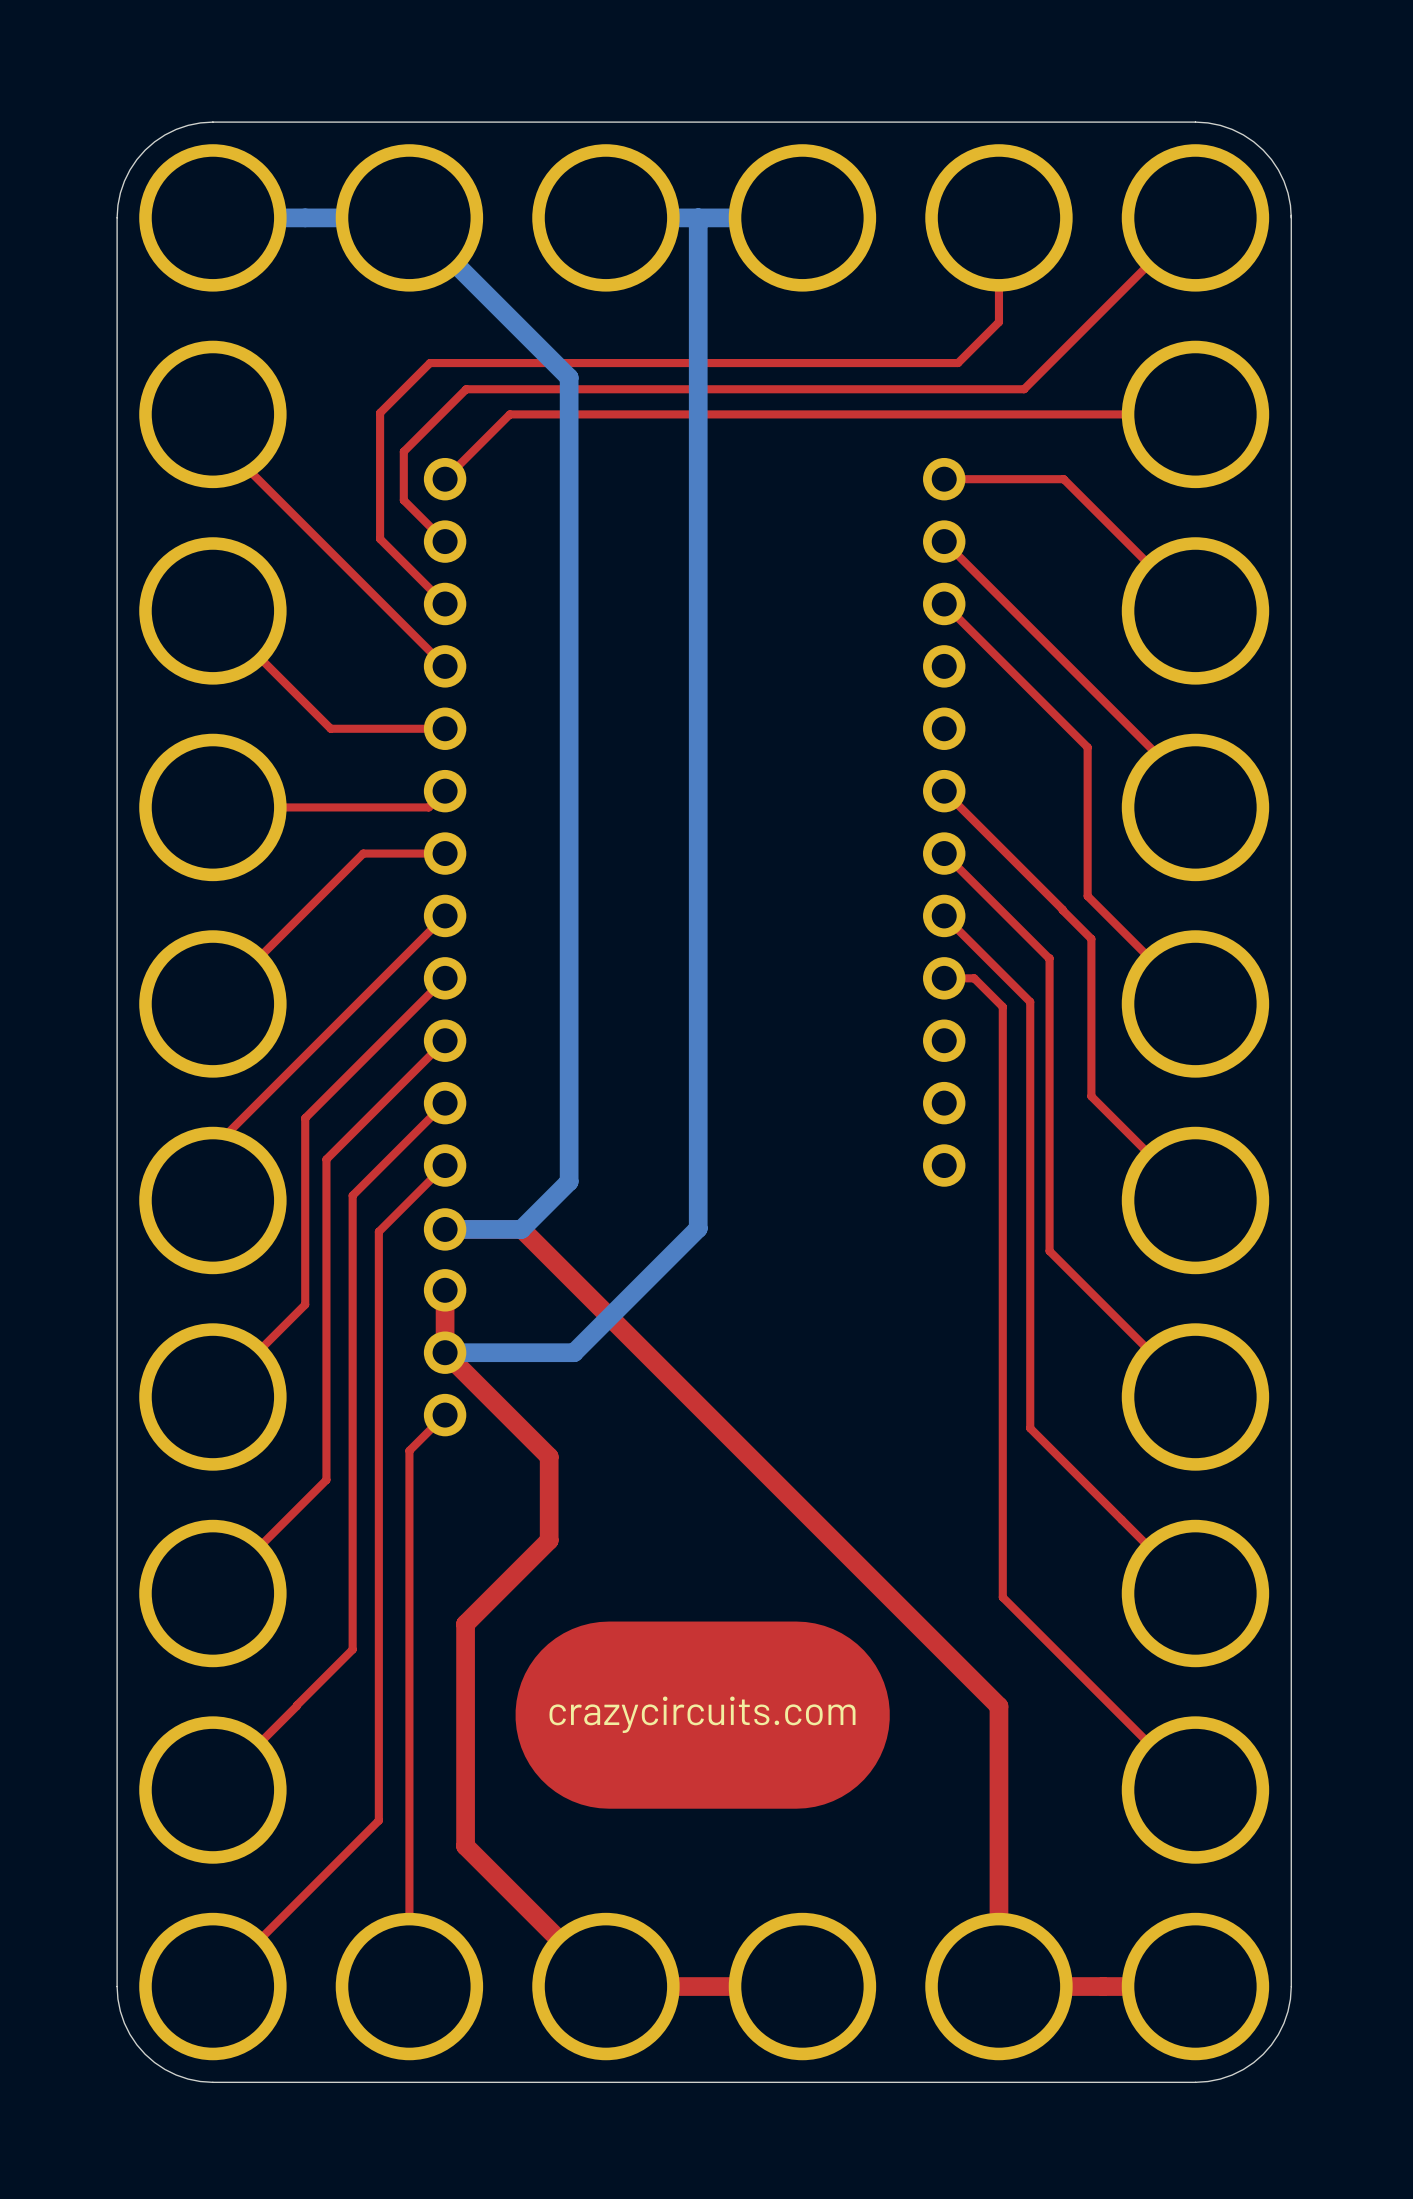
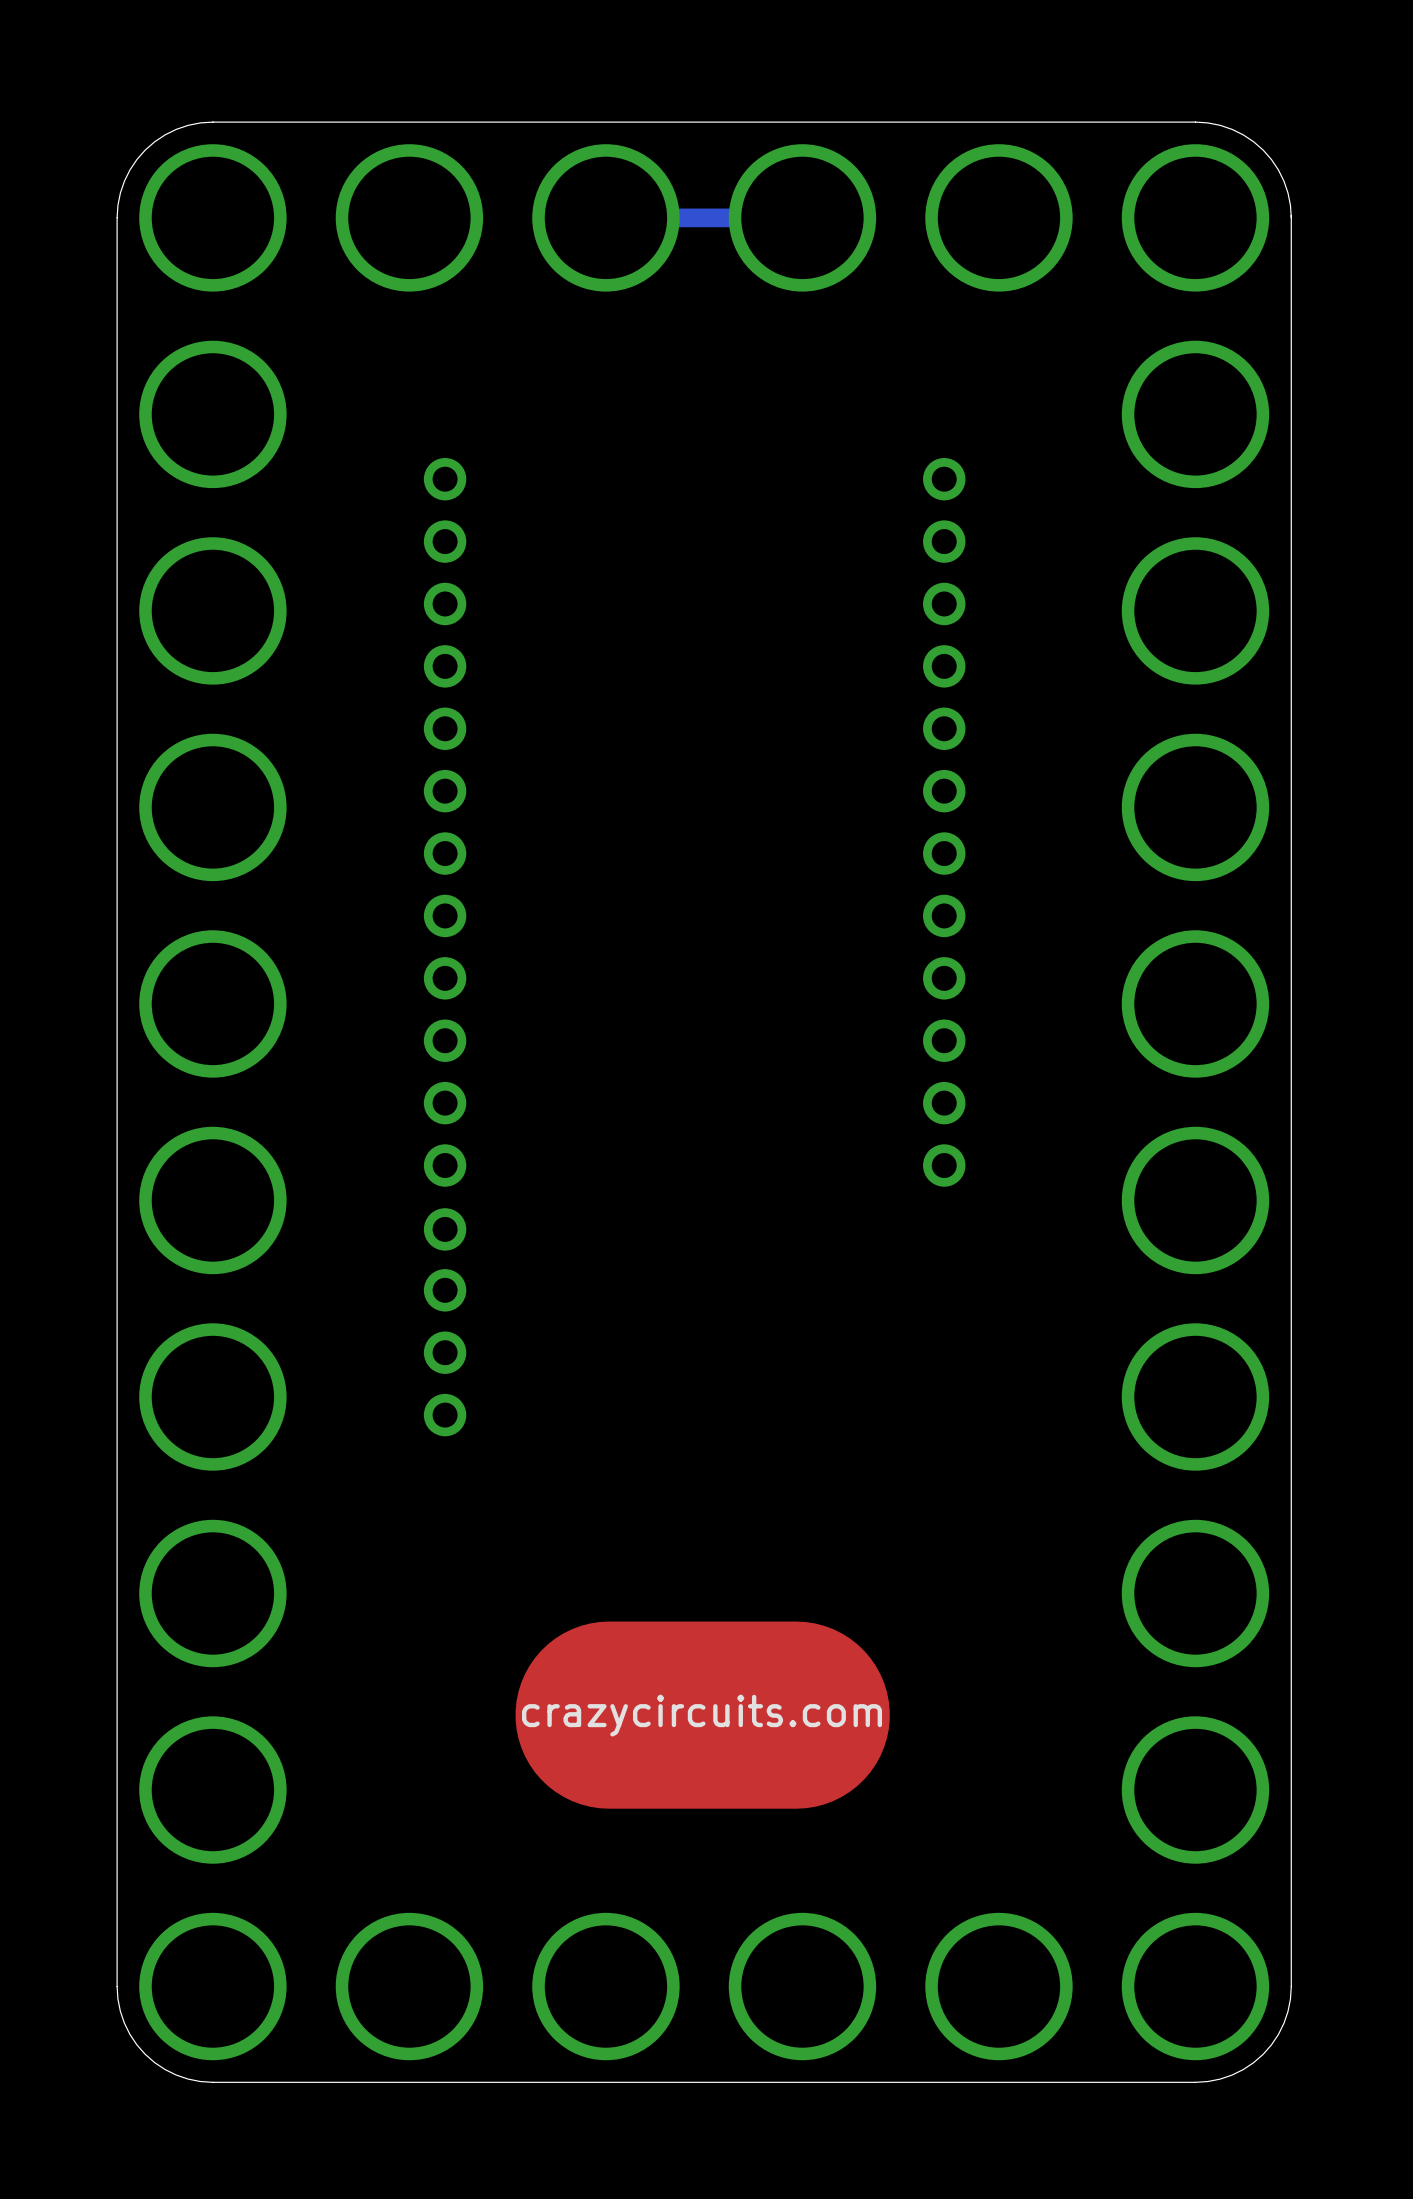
bottom track: (212, 217) (409, 217) (569, 377) (569, 1181) (521, 1229) (445, 1229) -> none
bottom track: (698, 217) (698, 1228) (574, 1352) (445, 1352) -> none
top track: (998, 217) (998, 322) (958, 363) (430, 363) (380, 412) (380, 538) (445, 603) -> none
top track: (1195, 217) (1024, 389) (466, 389) (403, 451) (403, 500) (445, 541) -> none
top track: (212, 414) (212, 434) (445, 666) -> none
top track: (1195, 414) (509, 414) (445, 479) -> none
top track: (944, 479) (1063, 479) (1195, 610) -> none
top track: (944, 541) (1195, 792) (1195, 807) -> none
top track: (944, 603) (1087, 747) (1087, 896) (1195, 1003) -> none
top track: (212, 610) (330, 728) (445, 728) -> none
top track: (445, 791) (428, 807) (212, 807) -> none
top track: (944, 791) (1091, 938) (1091, 1096) (1195, 1200) -> none
top track: (445, 853) (363, 853) (212, 1003) -> none
top track: (944, 853) (1049, 958) (1049, 1251) (1195, 1396) -> none
top track: (445, 915) (212, 1148) (212, 1200) -> none
top track: (944, 915) (1030, 1001) (1030, 1428) (1195, 1593) -> none
top track: (445, 978) (305, 1118) (305, 1304) (212, 1396) -> none
top track: (944, 978) (974, 978) (1002, 1006) (1002, 1597) (1195, 1790) -> none
top track: (445, 1040) (326, 1159) (326, 1479) (212, 1593) -> none
top track: (445, 1103) (352, 1195) (352, 1649) (212, 1790) -> none
top track: (445, 1165) (378, 1231) (378, 1820) (212, 1986) -> none
top track: (445, 1229) (522, 1229) (998, 1706) (998, 1986) (1195, 1986) -> none
top track: (445, 1290) (445, 1352) (549, 1456) (549, 1540) (465, 1624) (465, 1846) (605, 1986) (802, 1986) -> none
top track: (445, 1415) (409, 1450) (409, 1986) -> none

